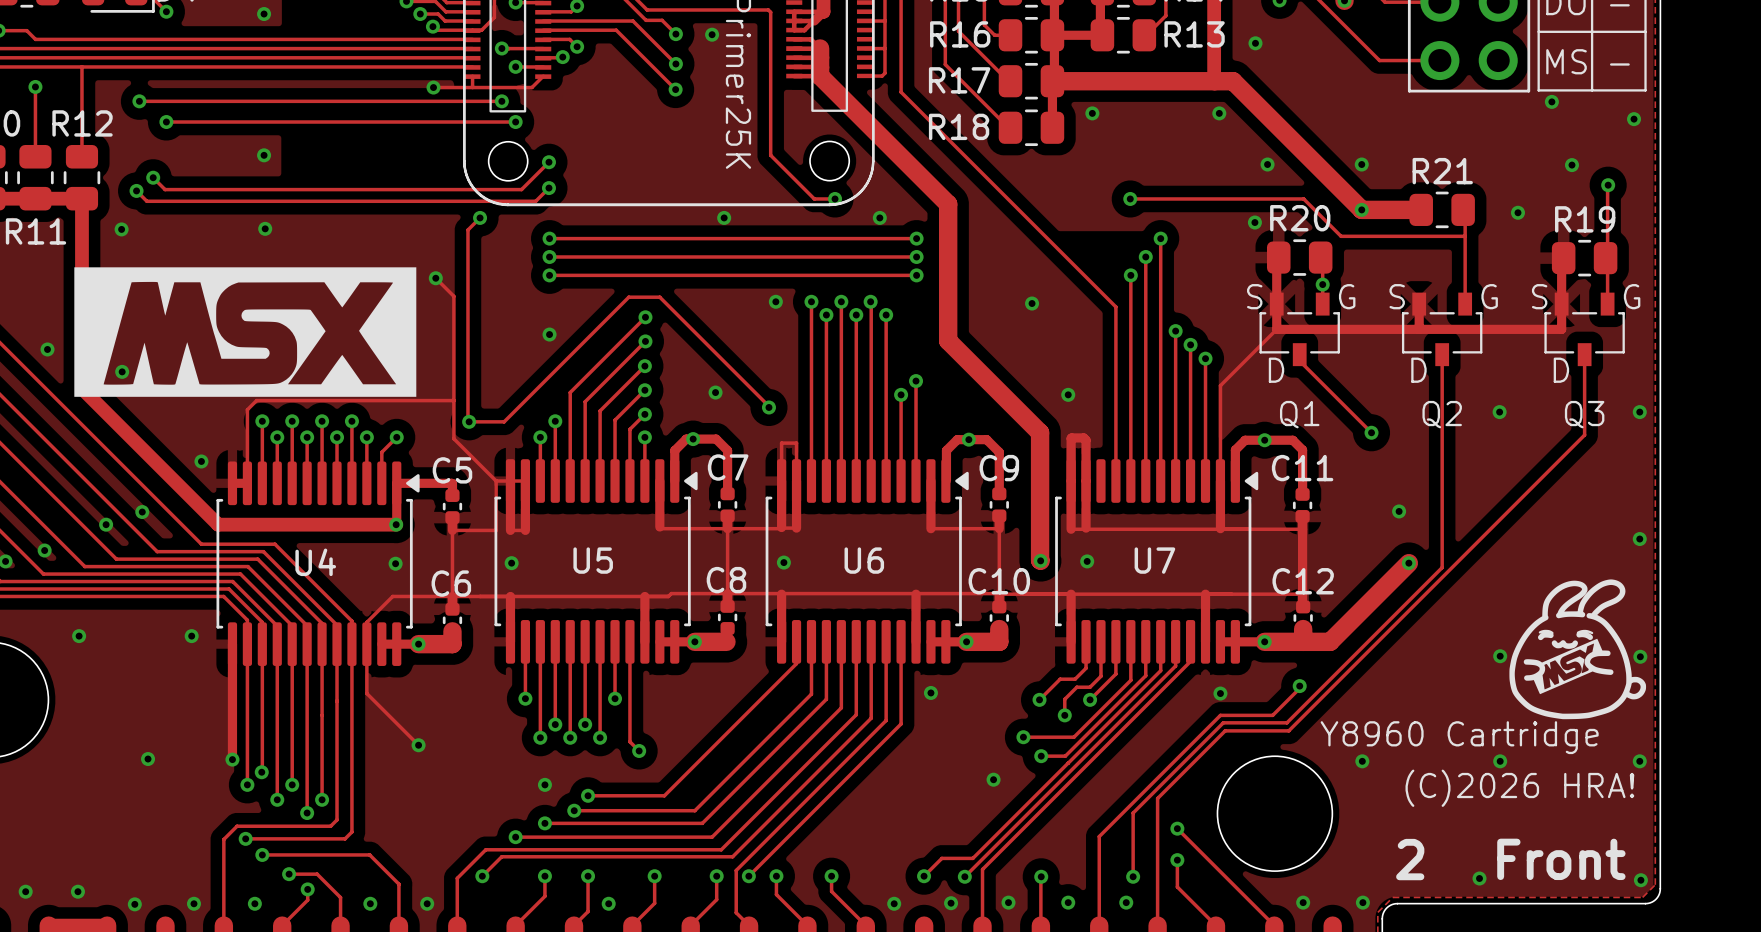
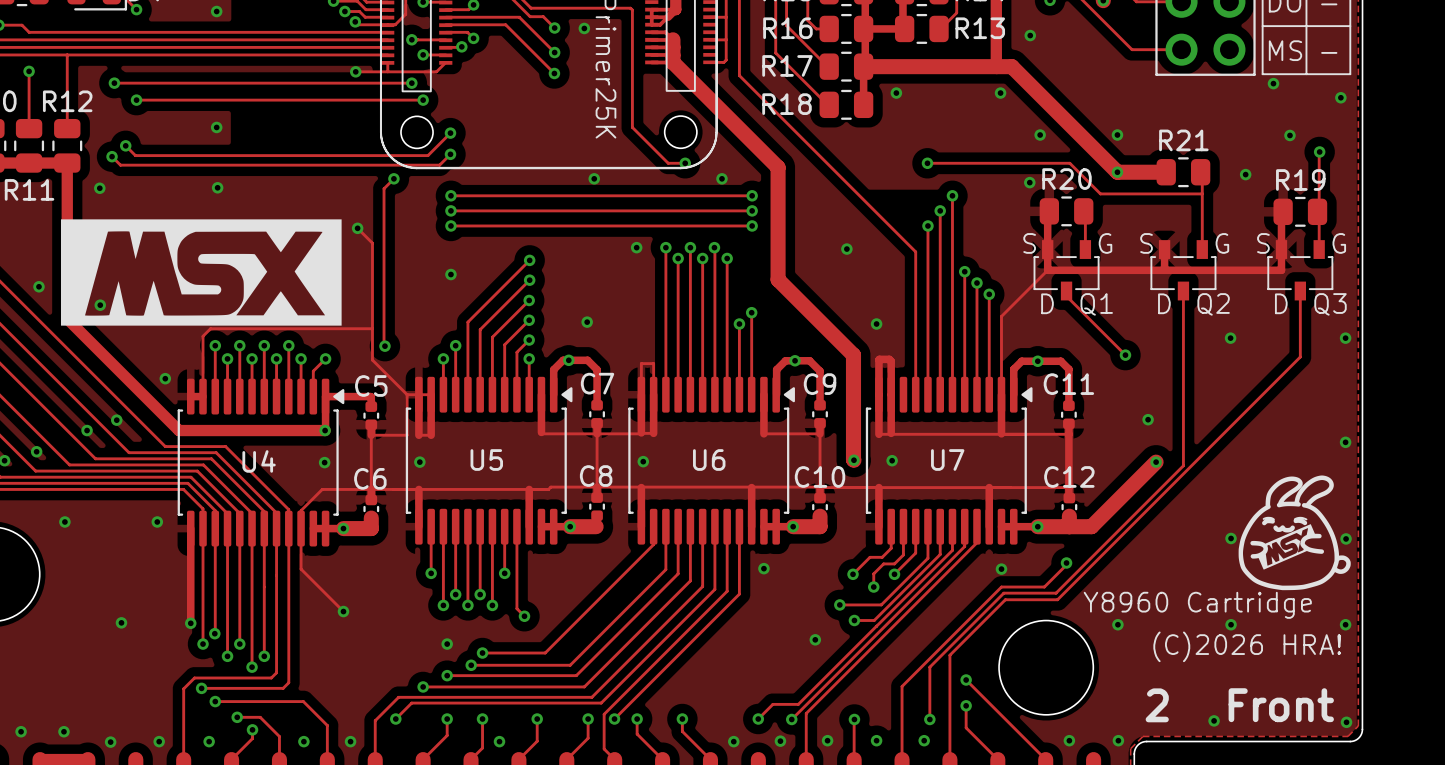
via: (1322, 284) -> none
track: (768, 407) (659, 297) (628, 297) (504, 421) (469, 421) -> none
via: (768, 407) -> none
Q1 name position: Q1 (1299, 414) -> Q1 (1096, 304)
Q2 name position: Q2 (1442, 414) -> Q2 (1213, 304)
Q3 name position: Q3 (1584, 414) -> Q3 (1330, 304)

